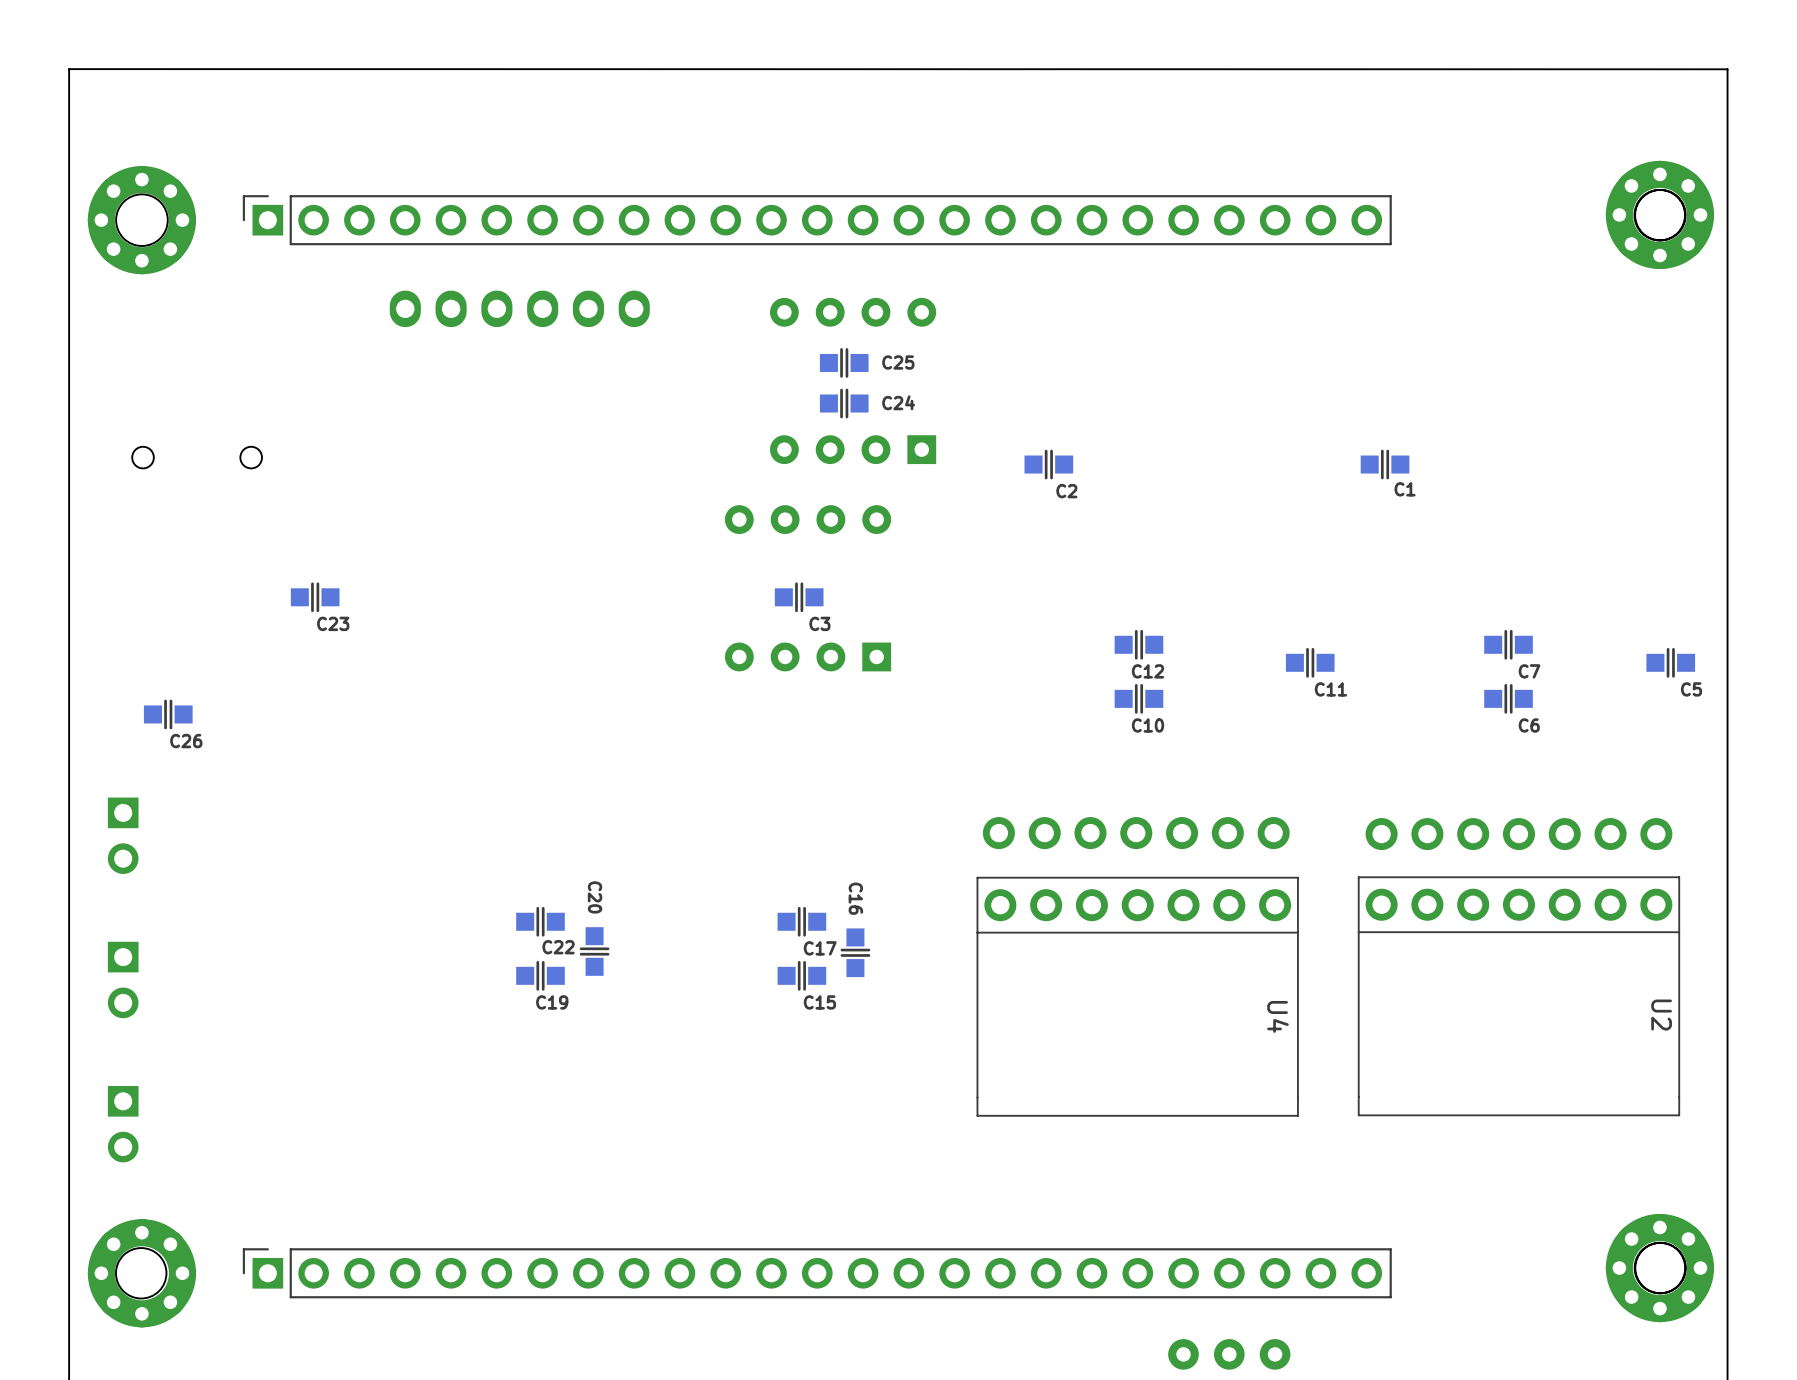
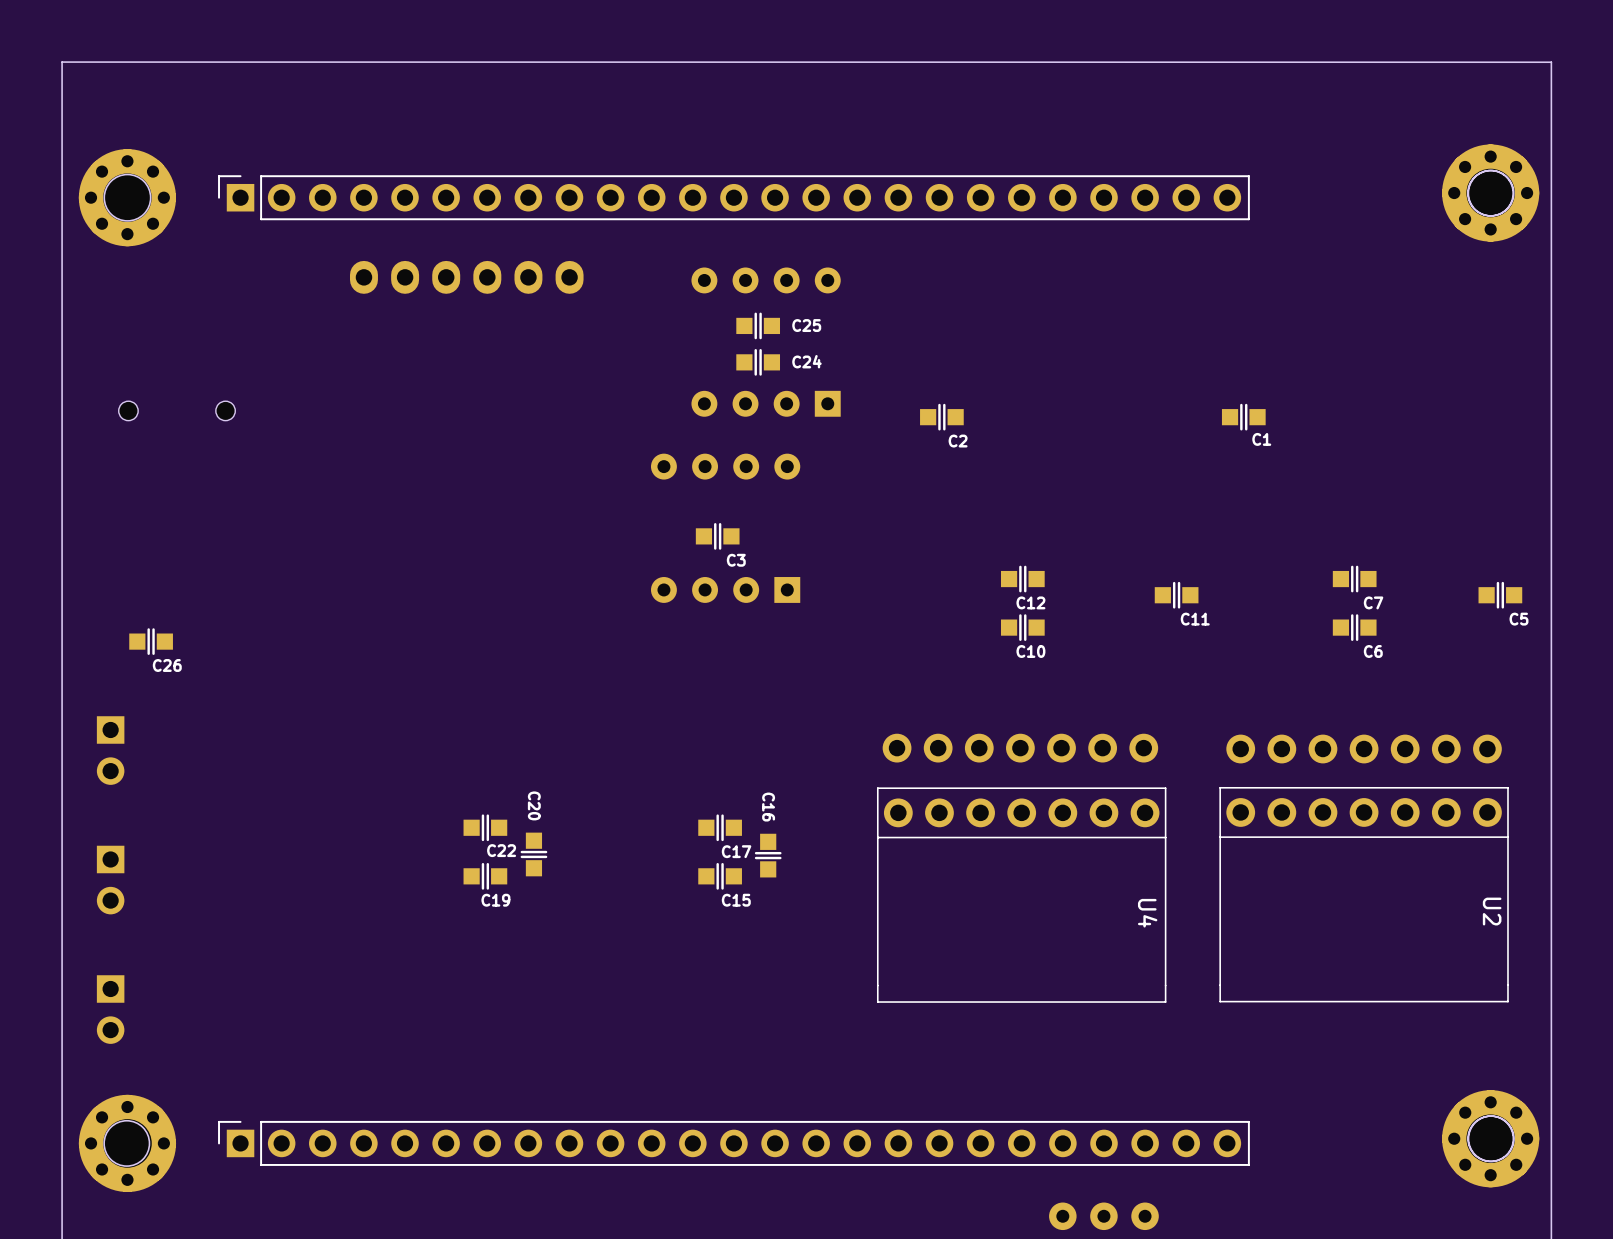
C23: (315, 597) -> none

